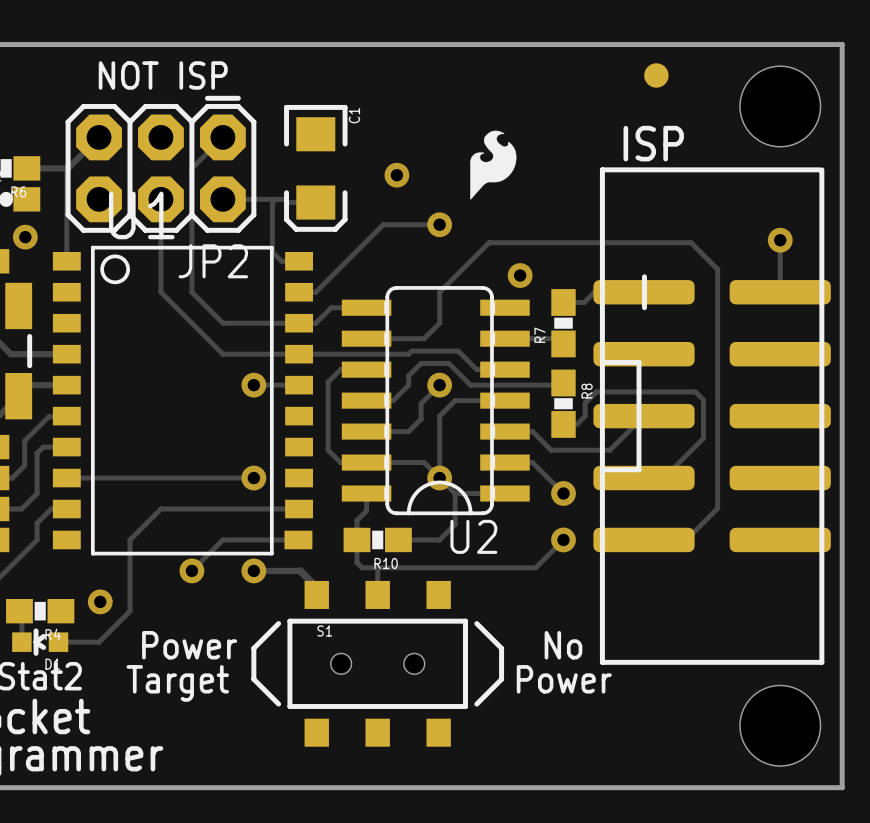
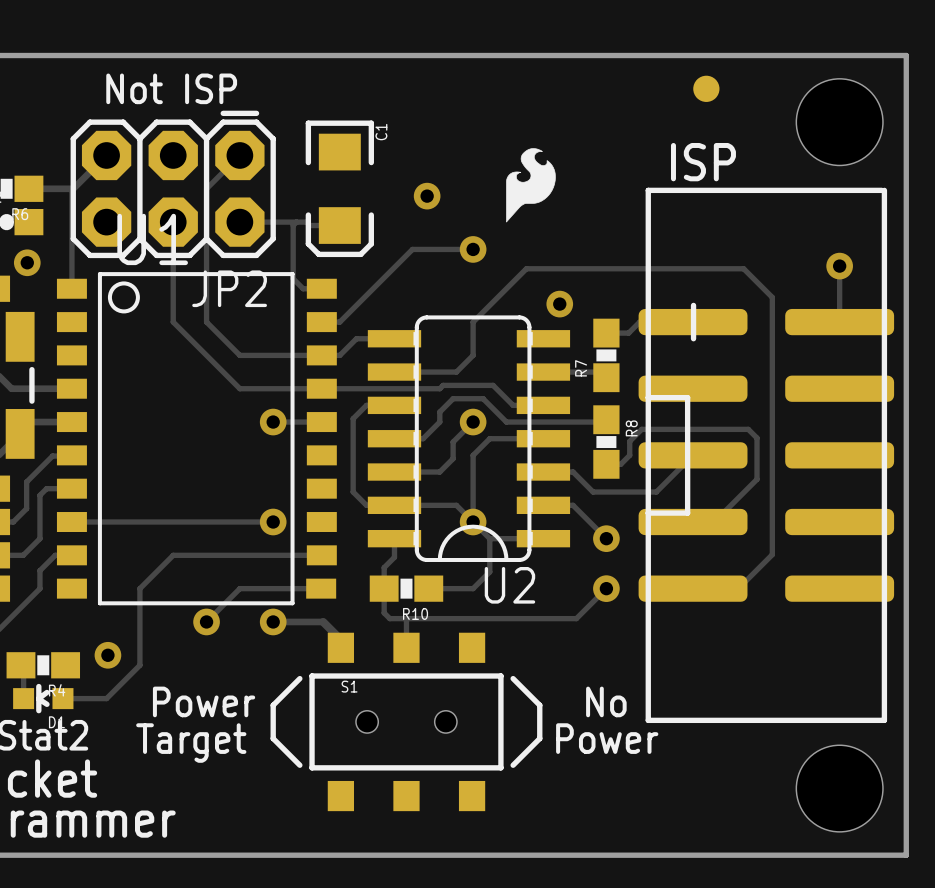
text: NOT ISP (163, 75) -> Not ISP (171, 88)

